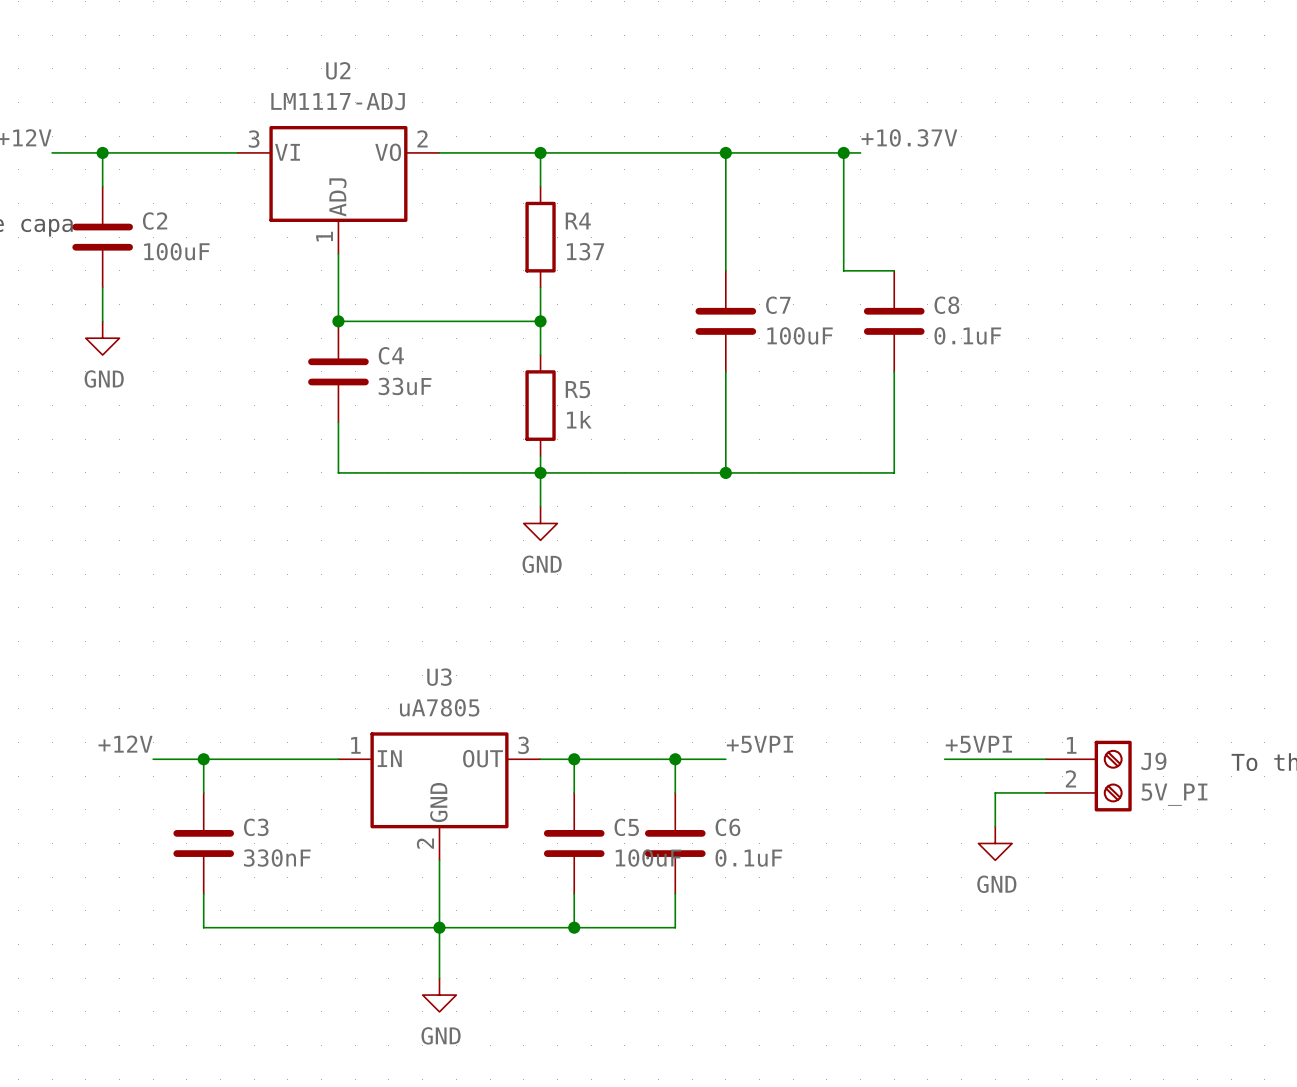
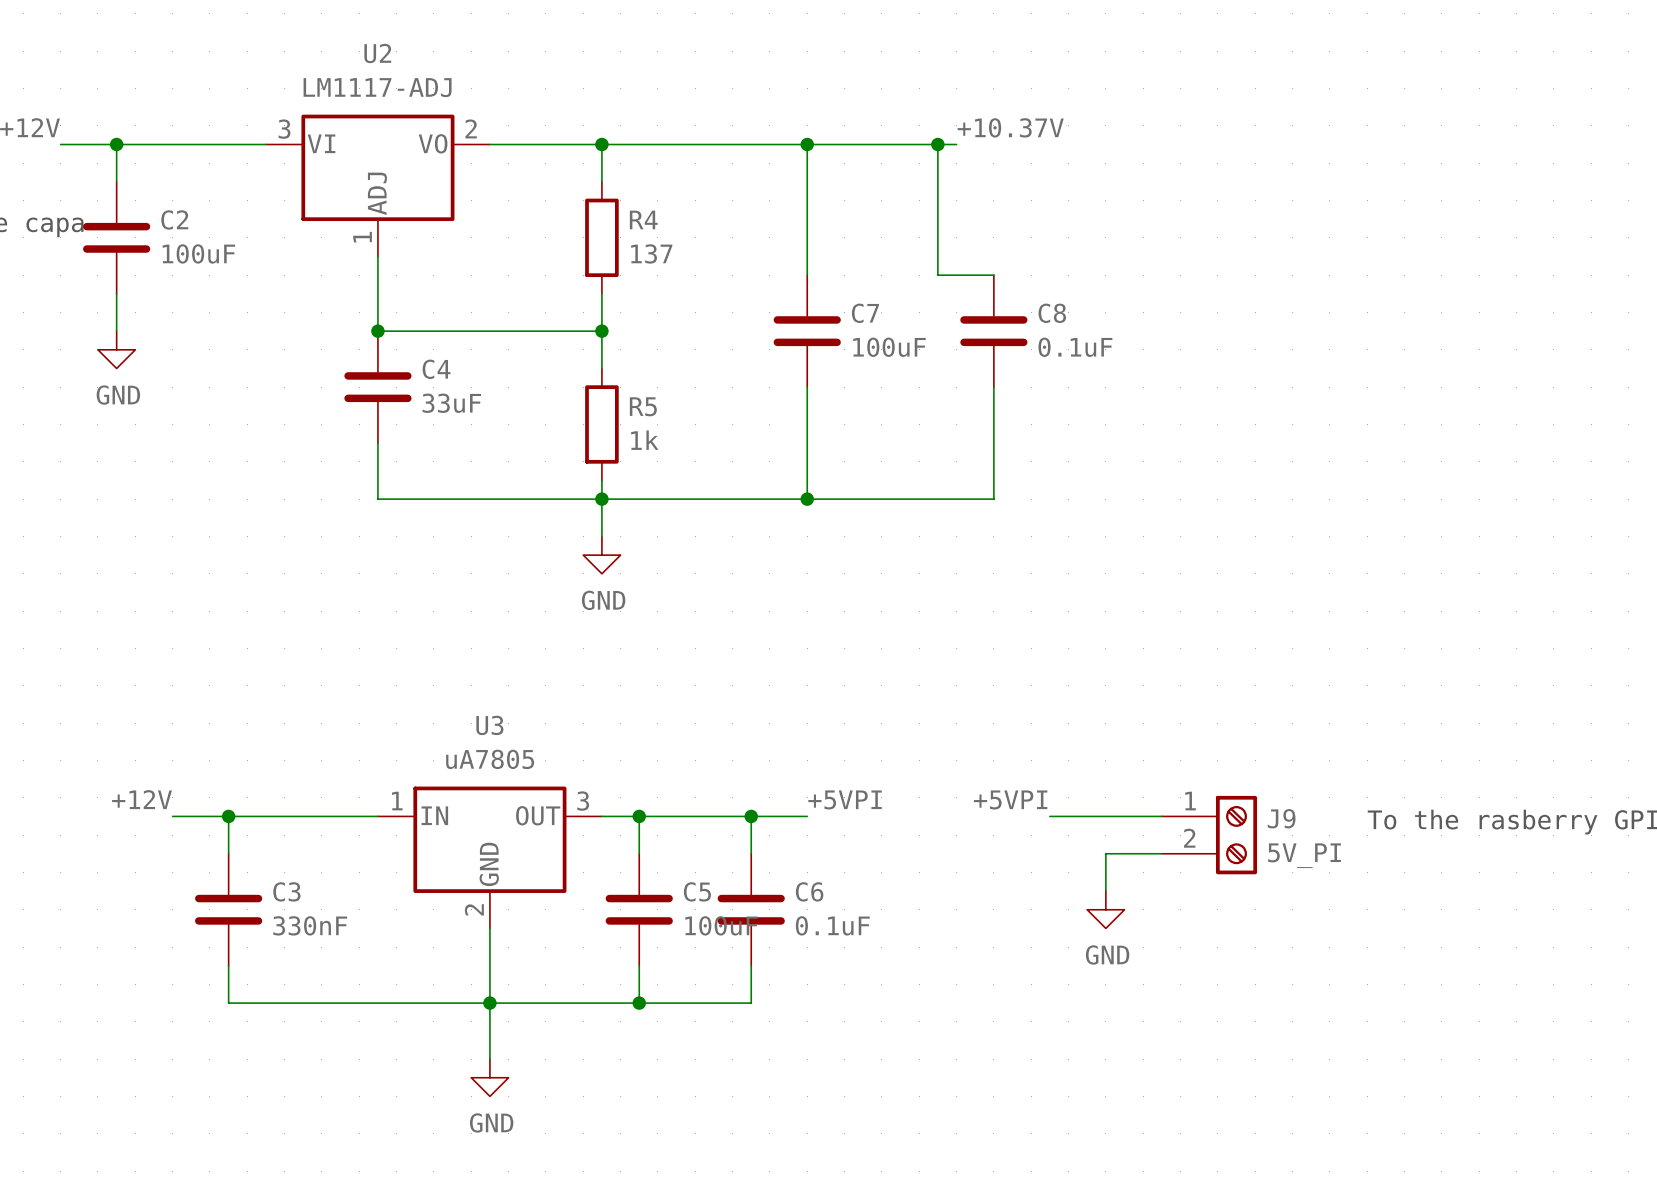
label position: +5VPI (978, 744) -> +5VPI (1010, 799)

